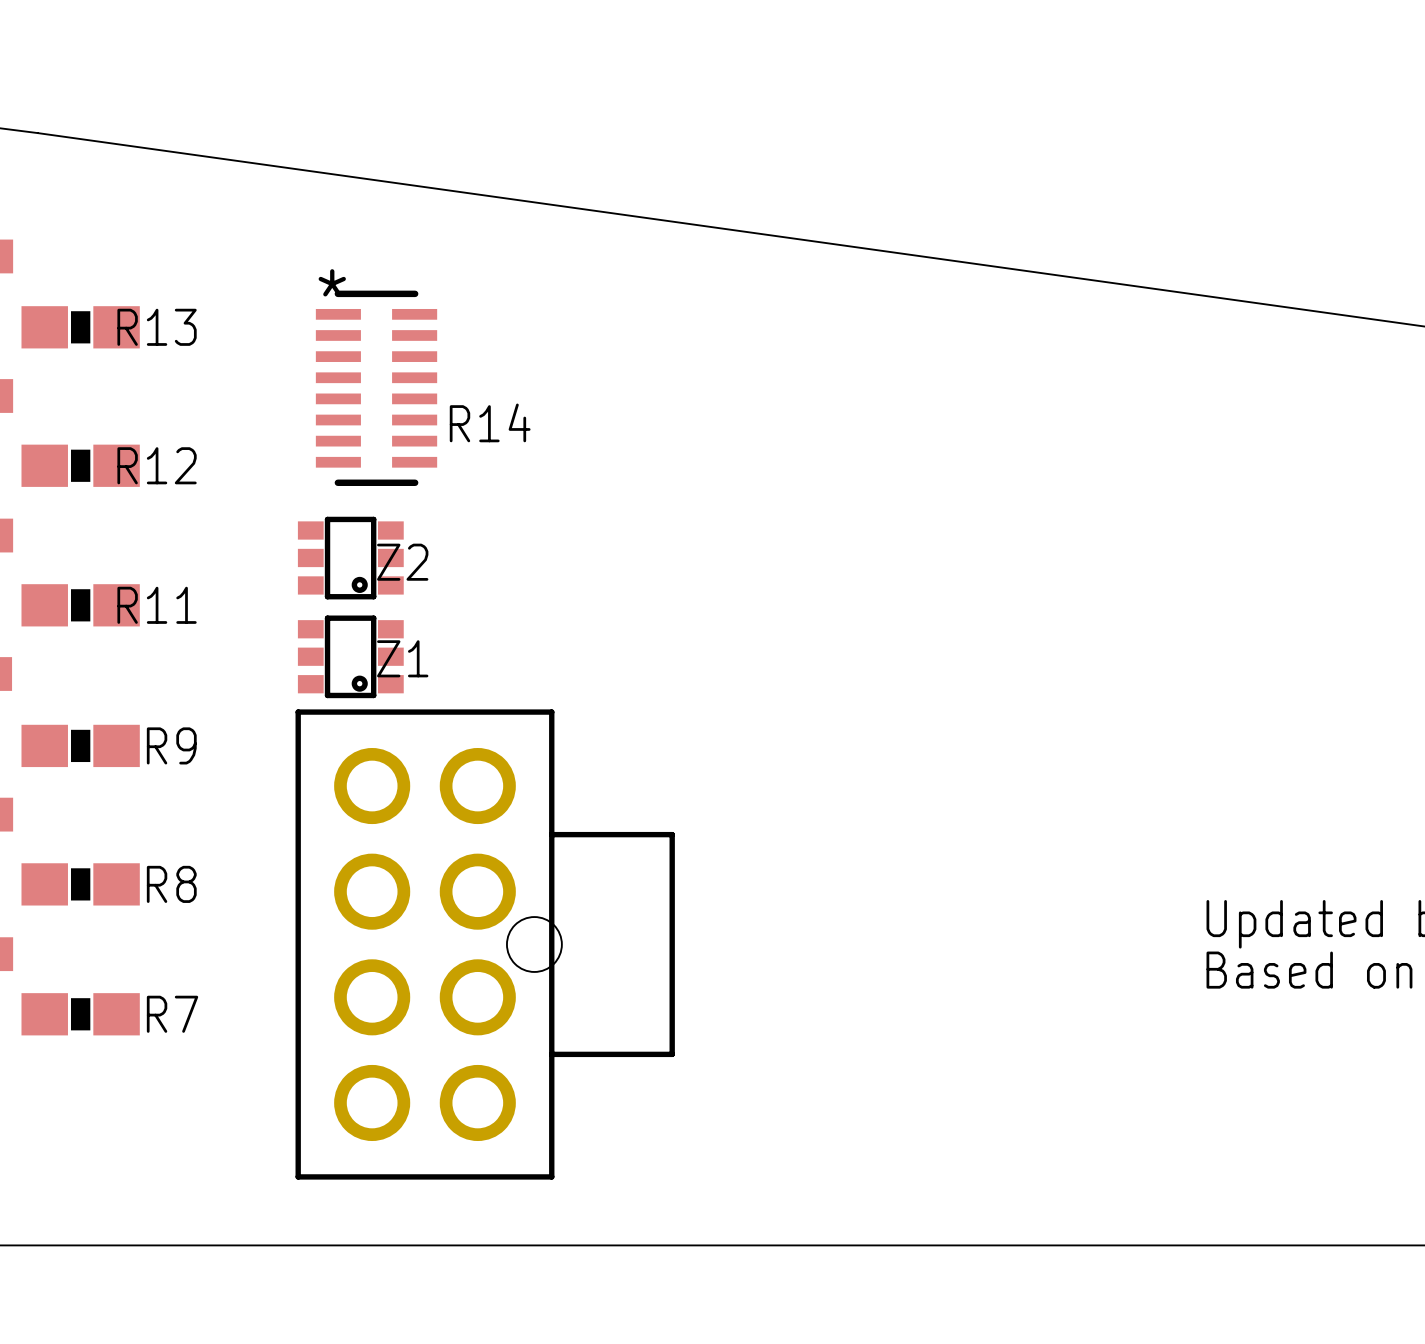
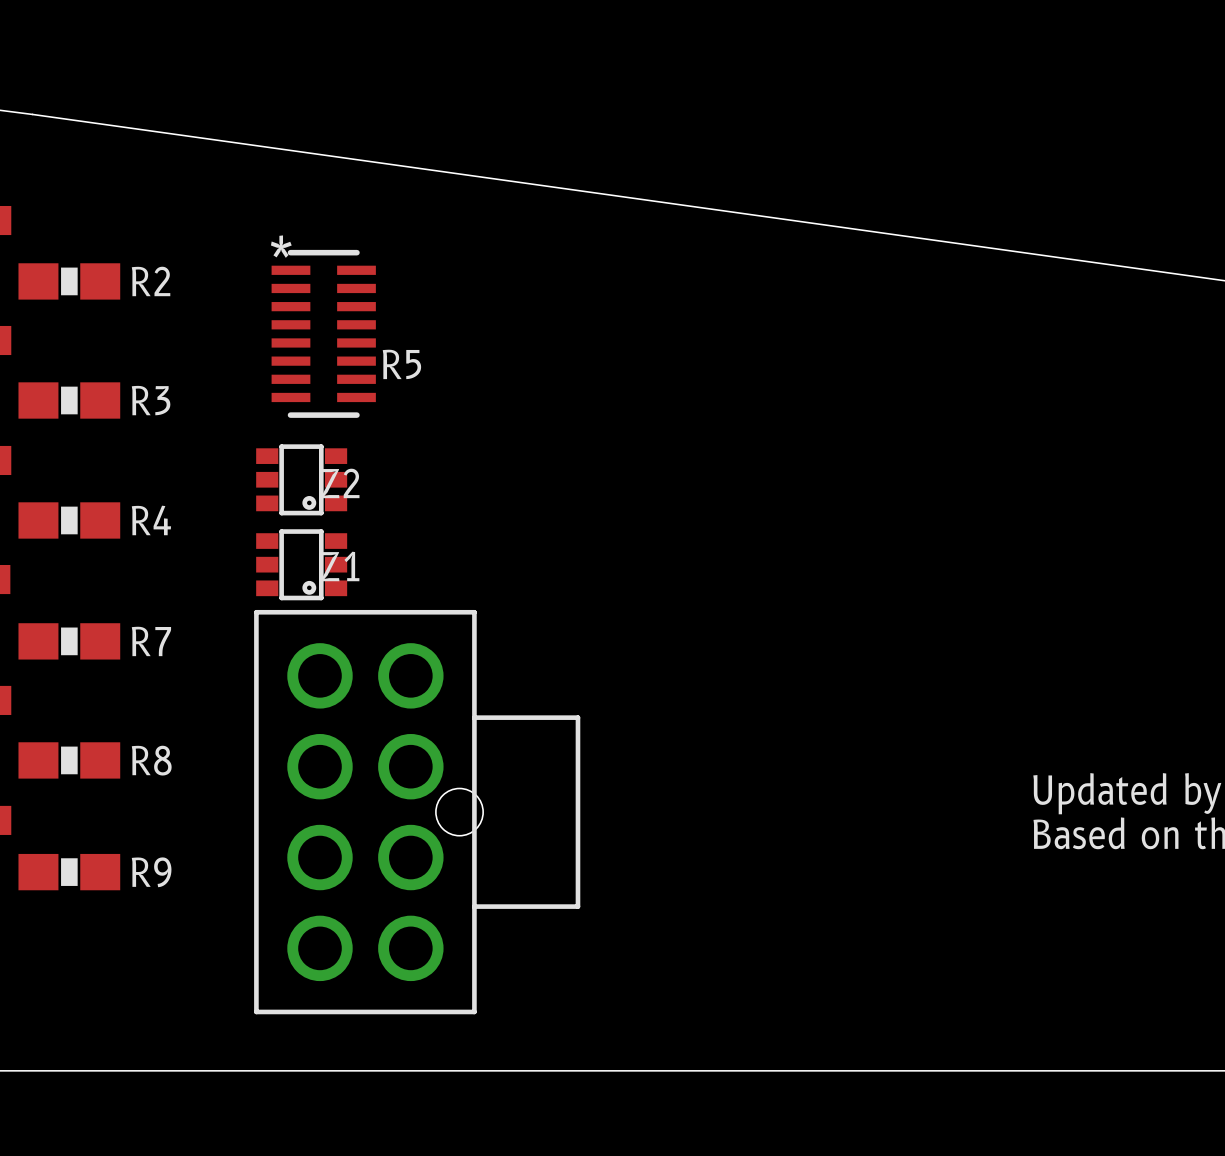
R13 name: R13 (157, 327) -> R2 (151, 281)
R14 name: R14 (490, 422) -> R5 (401, 364)
R12 name: R12 (157, 465) -> R3 (151, 400)
R11 name: R11 (157, 605) -> R4 (151, 520)
R9 name: R9 (171, 745) -> R7 (151, 641)
R7 name: R7 (172, 1014) -> R9 (151, 872)

